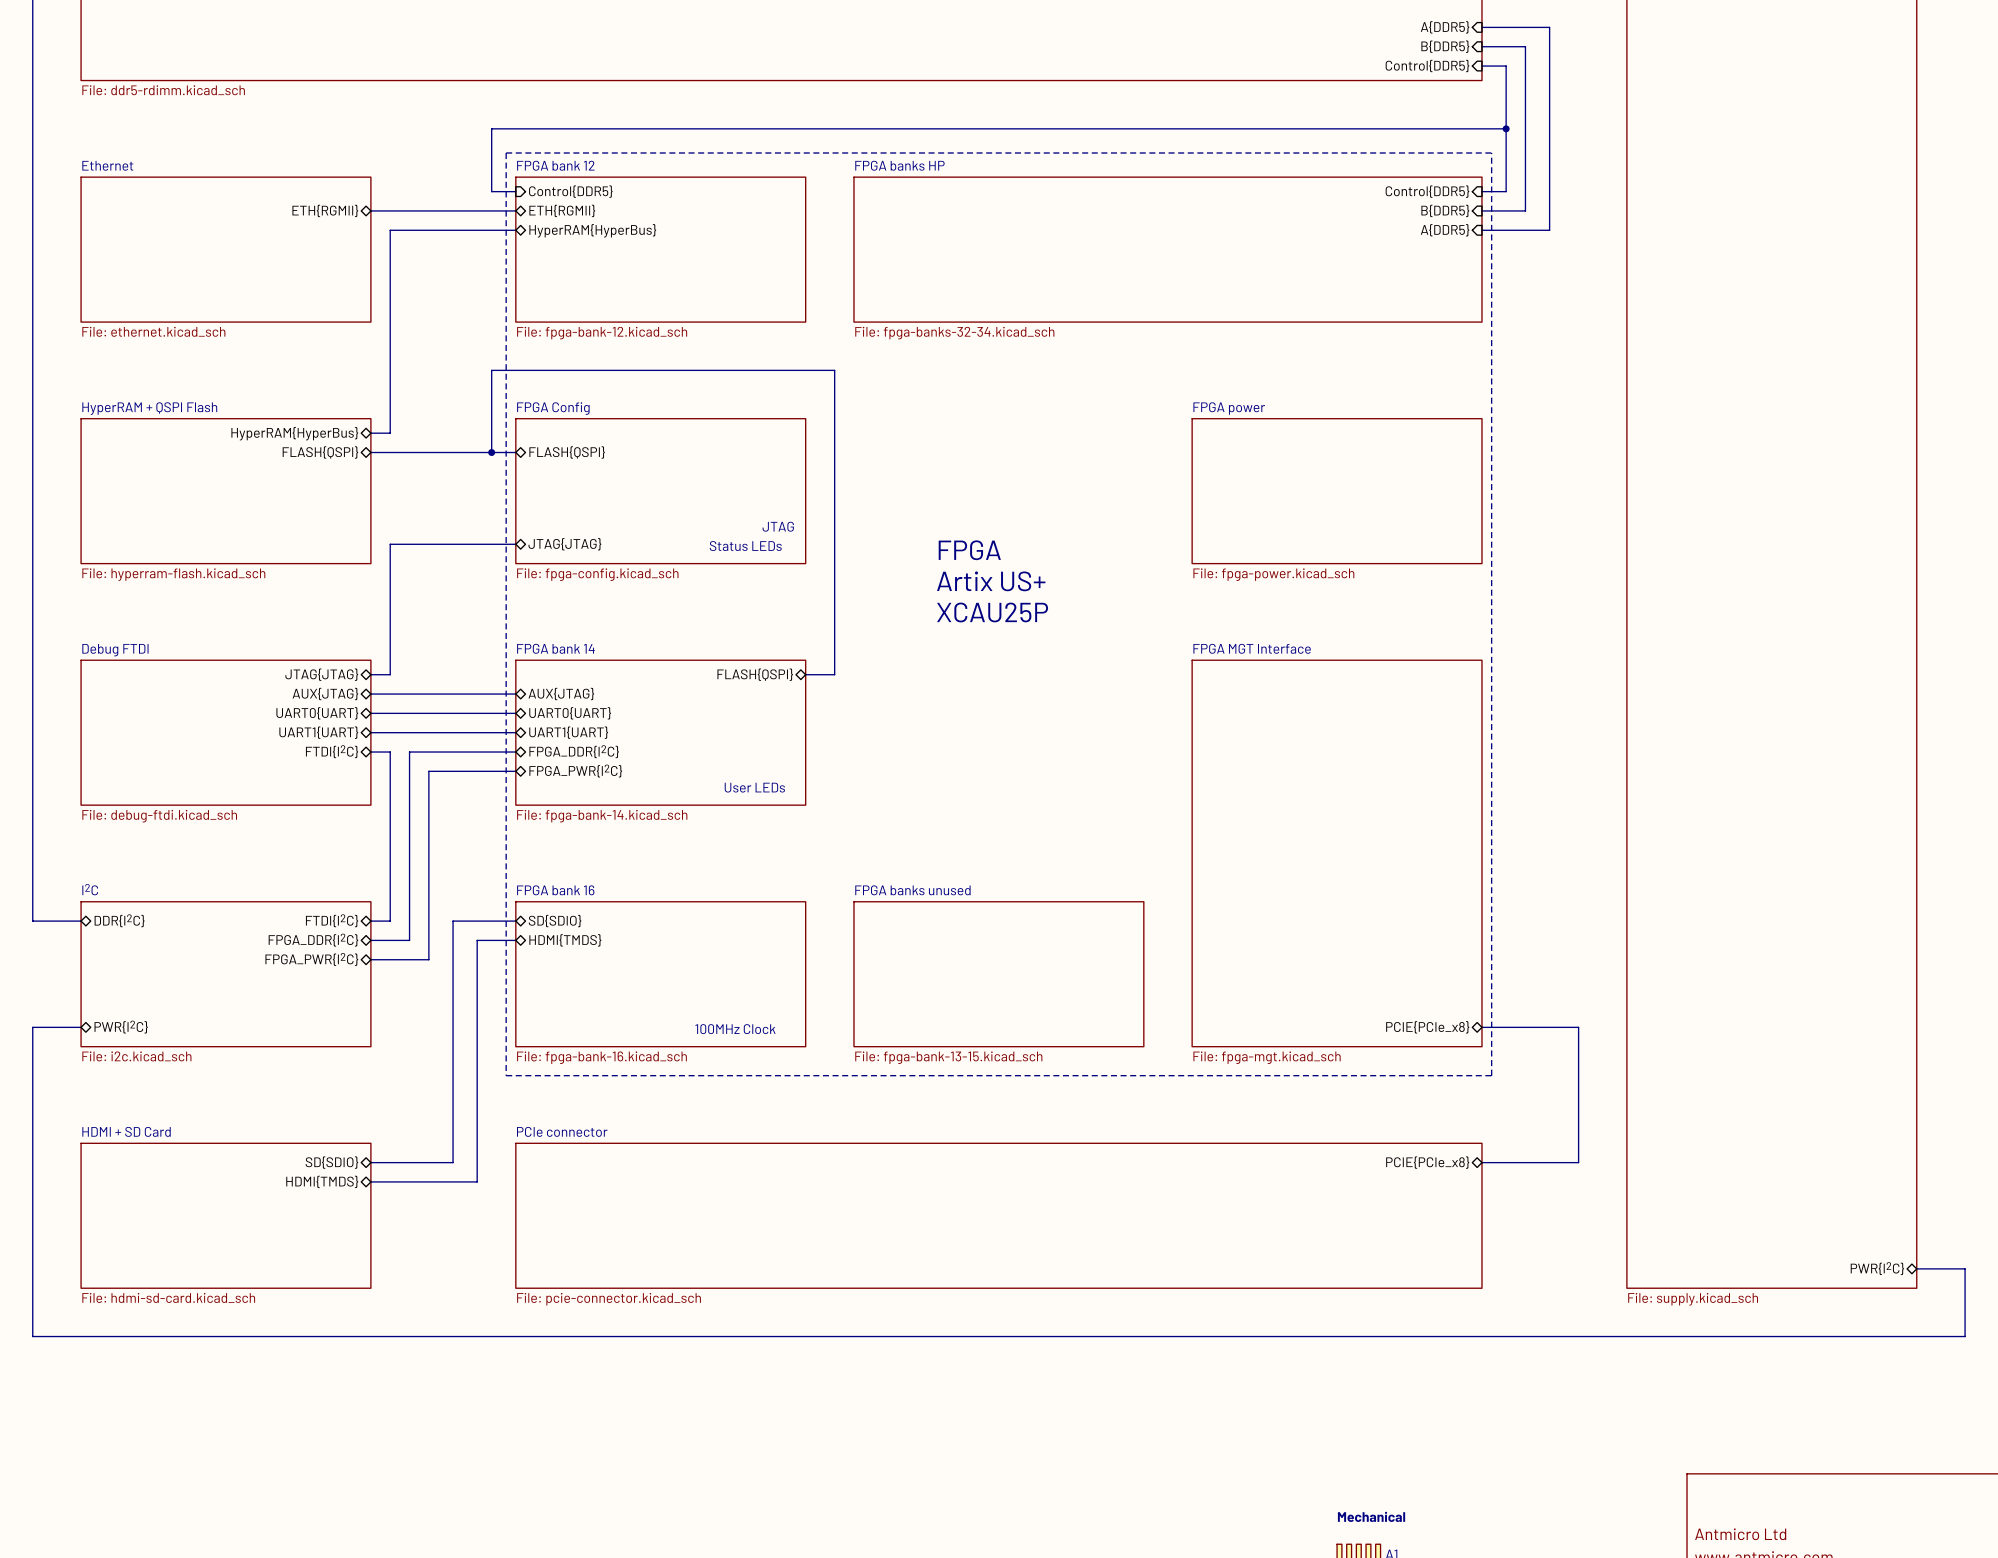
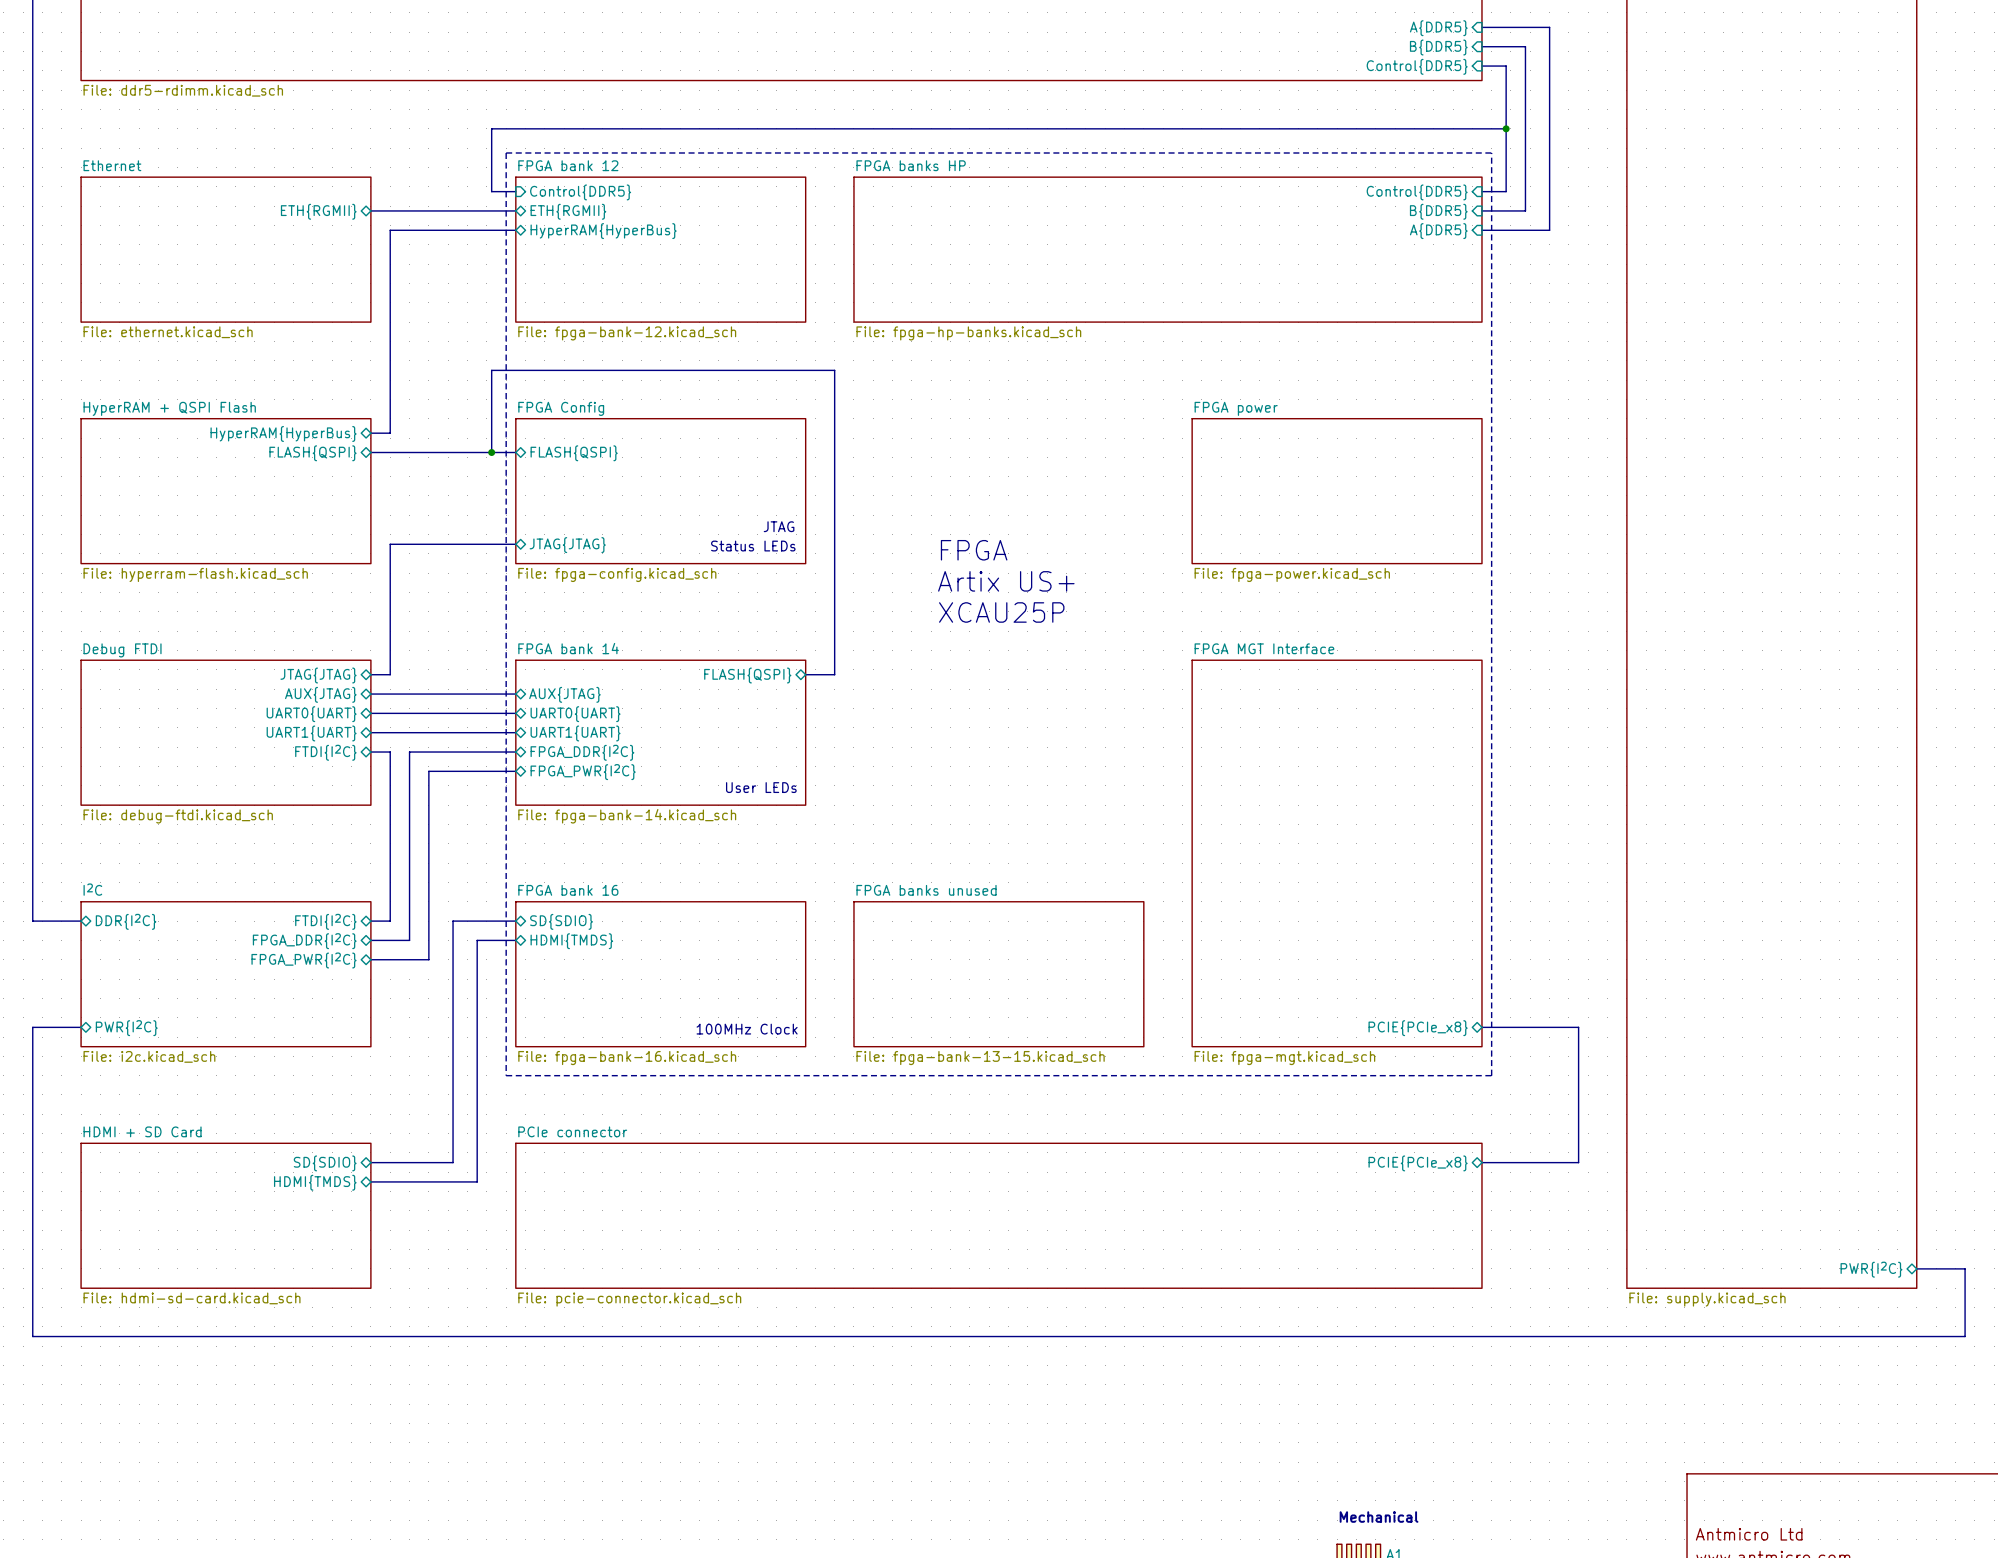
sheet FPGA banks HP value: File: fpga-banks-32-34.kicad_sch (954, 333) -> File: fpga-hp-banks.kicad_sch (968, 333)

